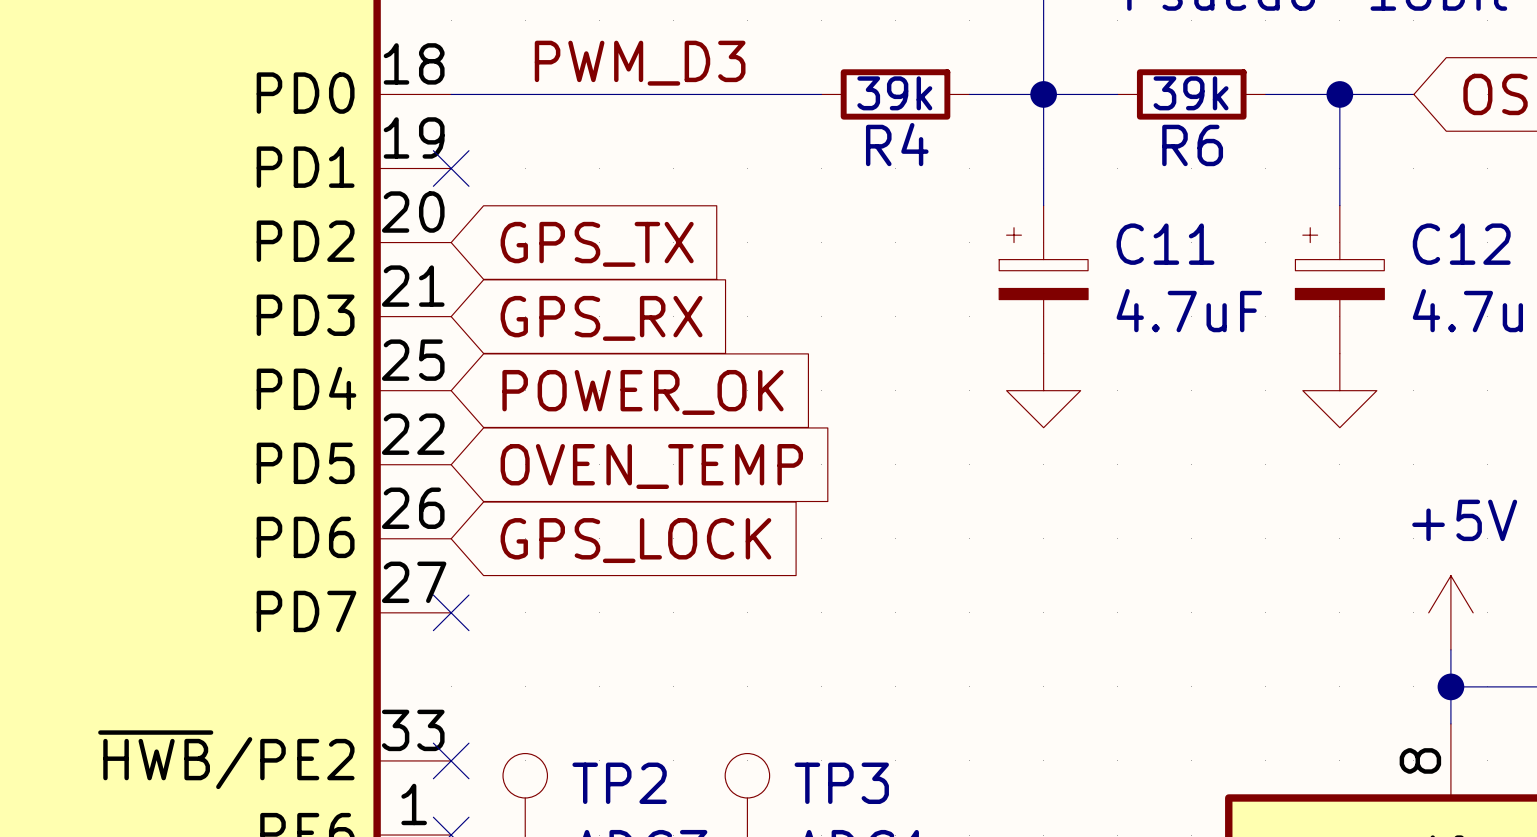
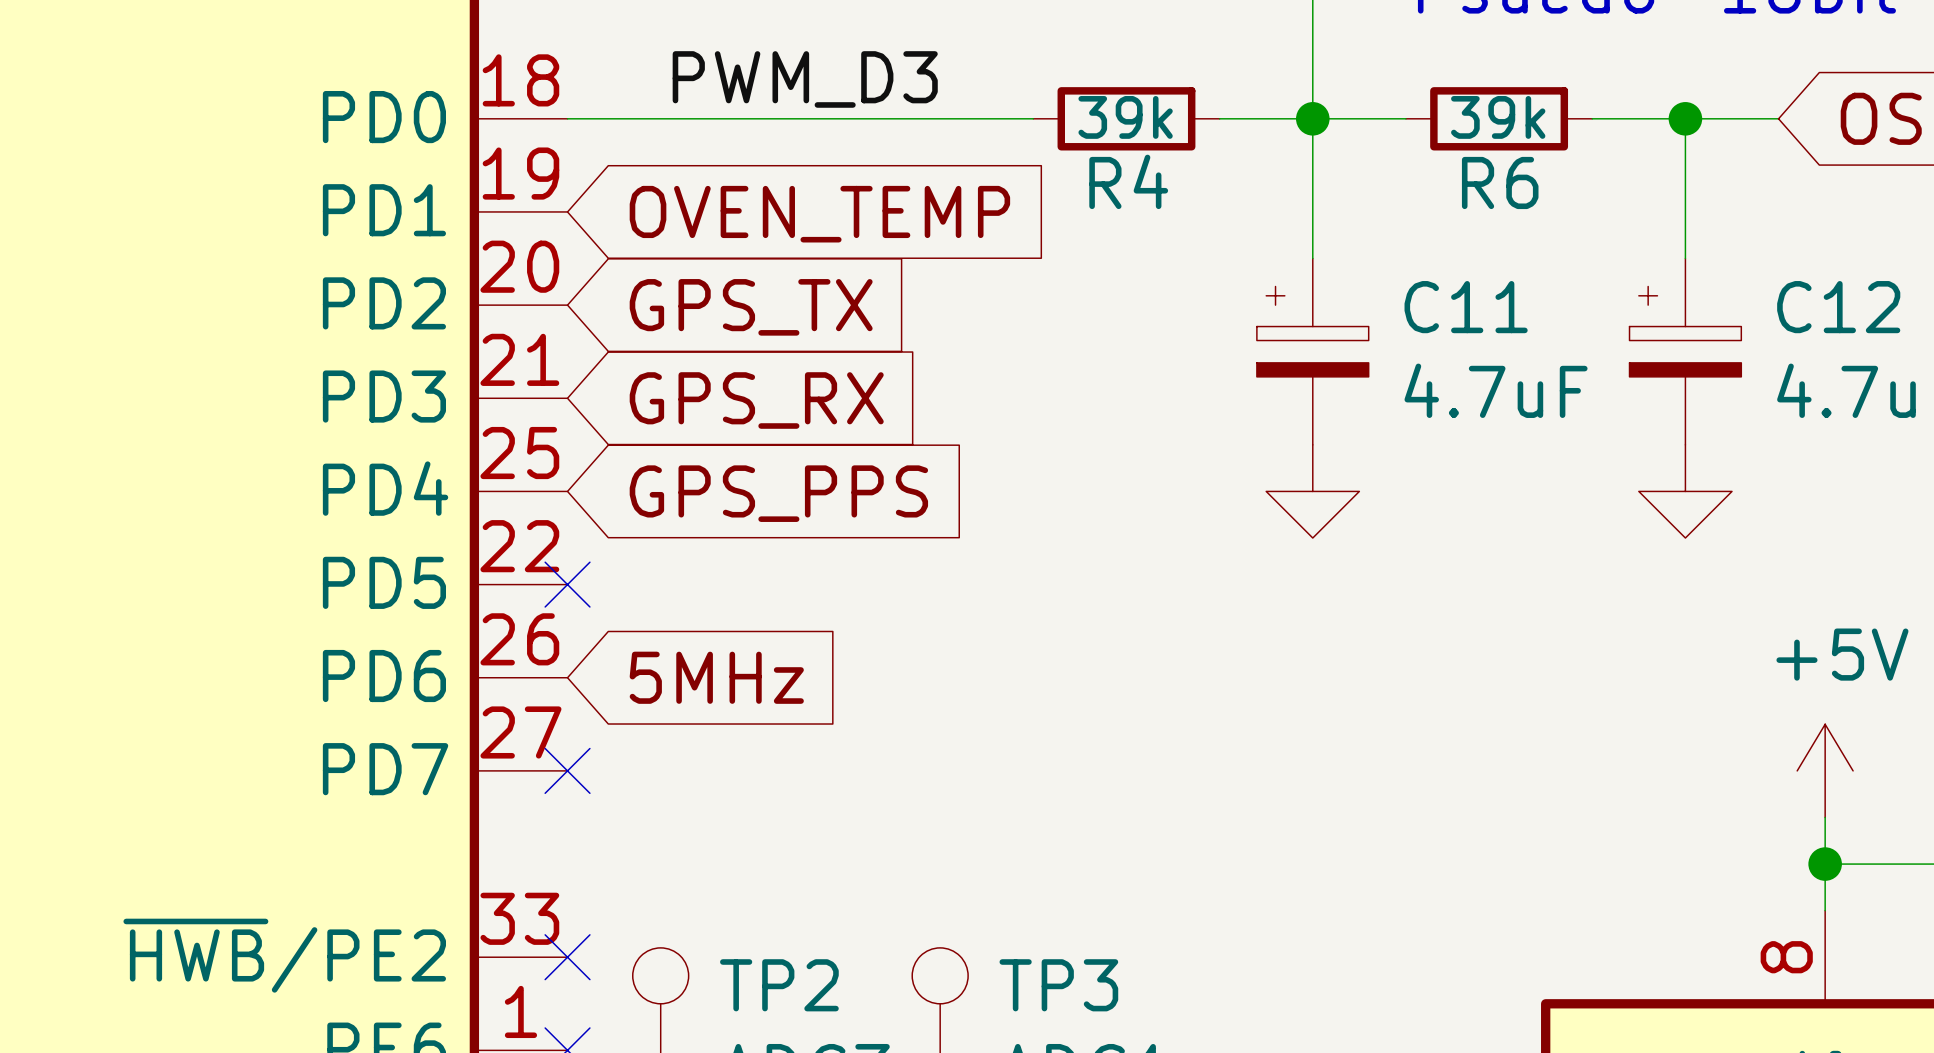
no-connect mark: (451, 168) -> none
global label: POWER_OK (642, 392) -> GPS_PPS (778, 493)
no-connect mark: none -> (567, 584)
global label position: OVEN_TEMP (651, 466) -> OVEN_TEMP (819, 214)
global label: GPS_LOCK (635, 540) -> 5MHz (716, 677)

